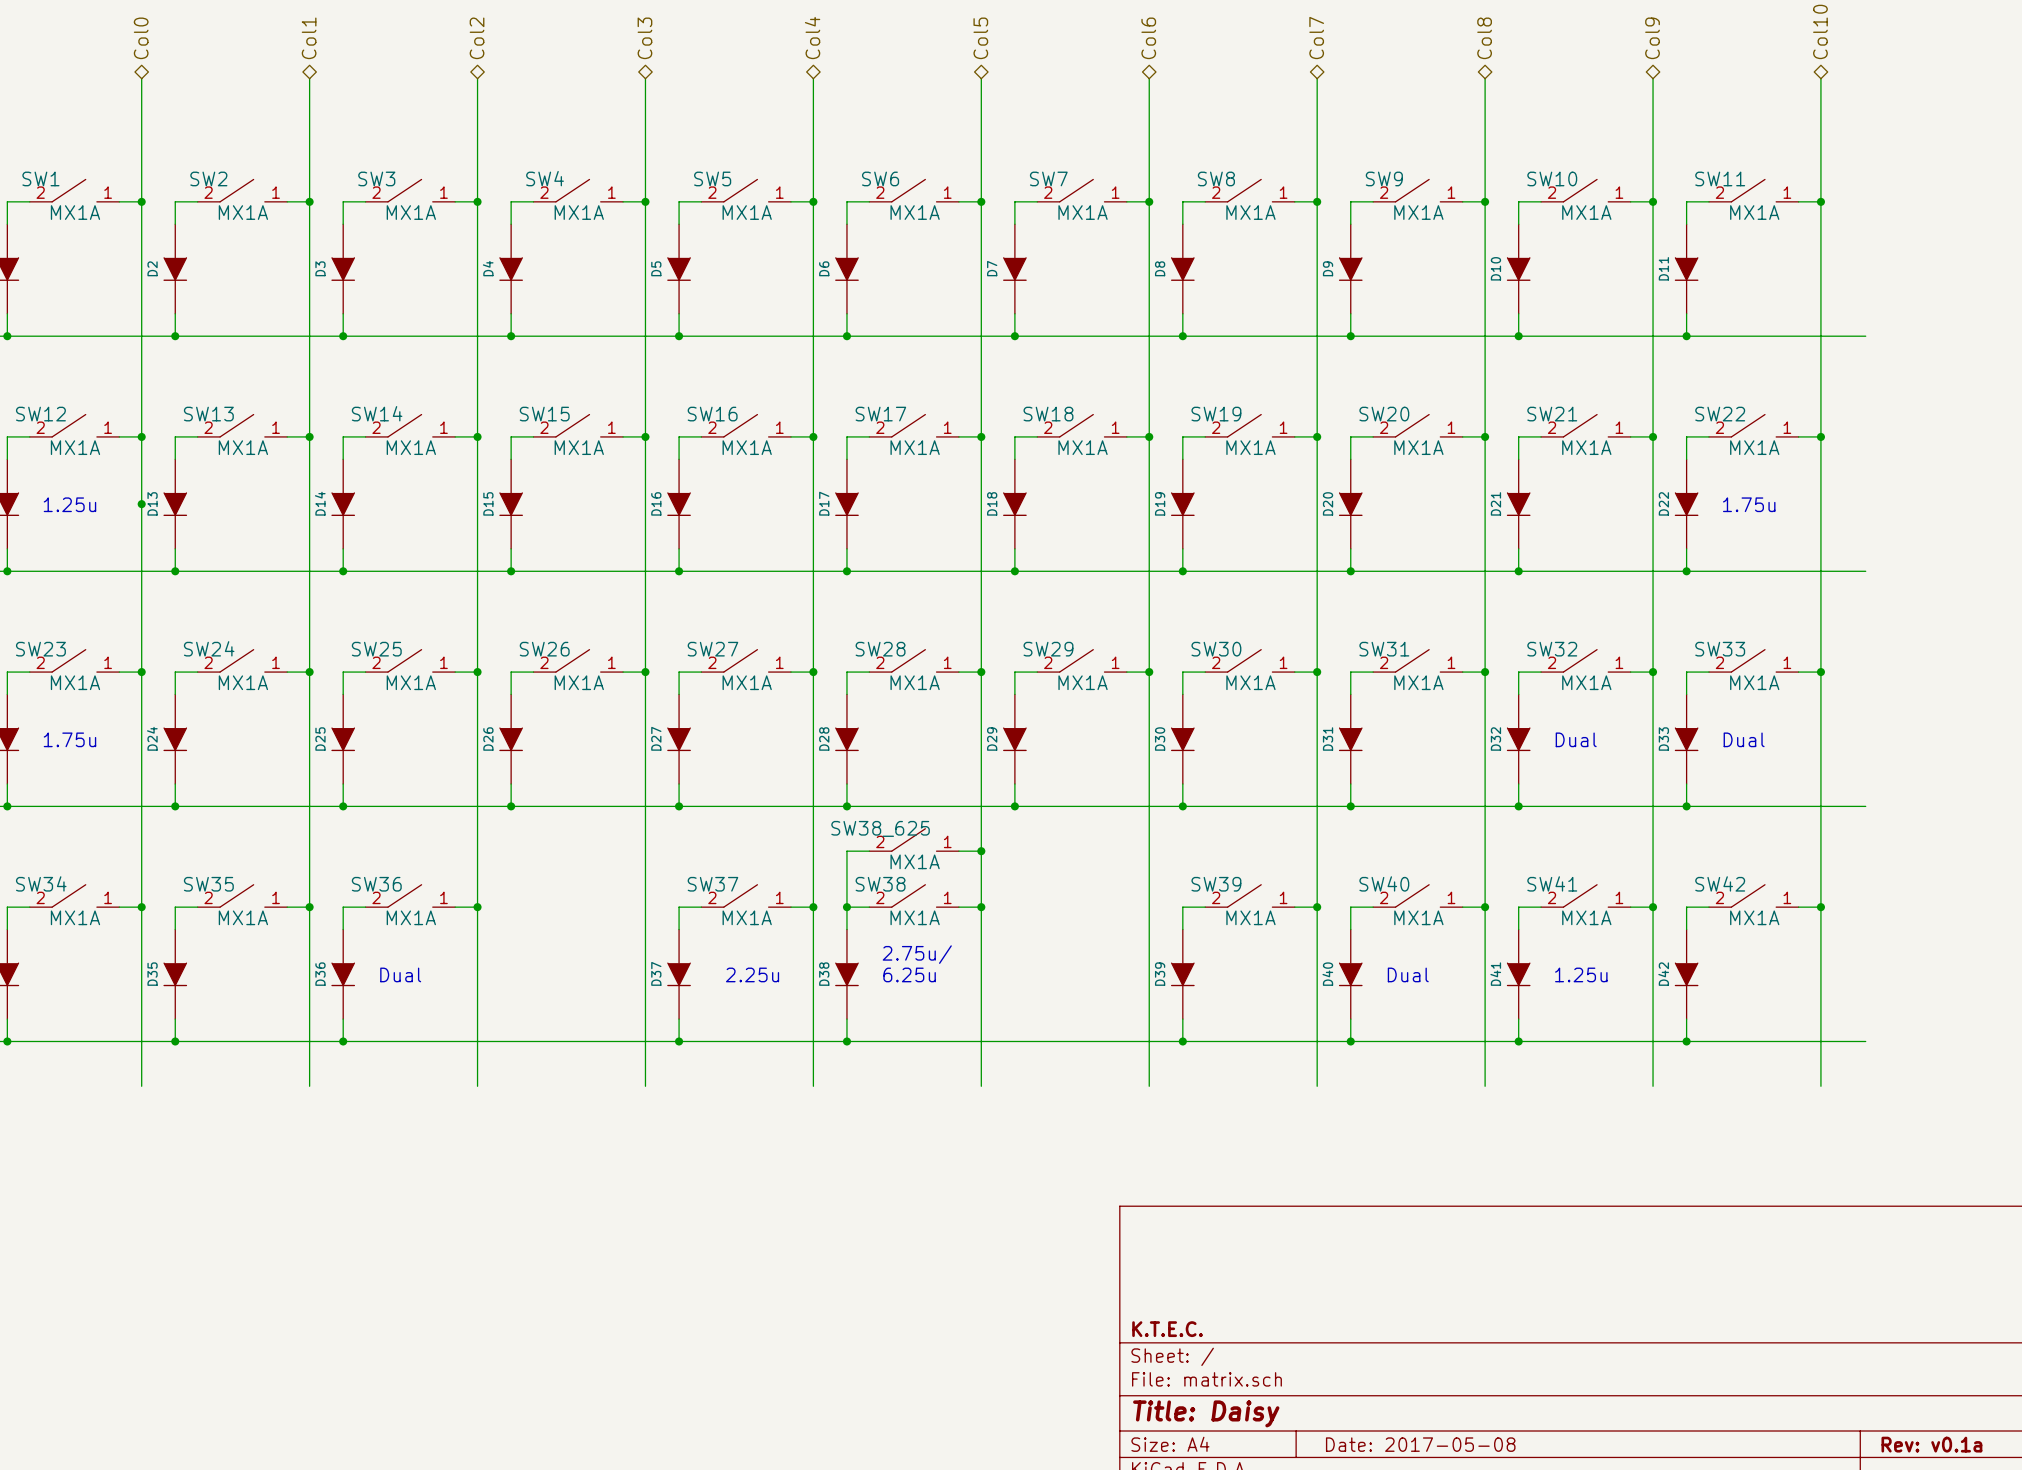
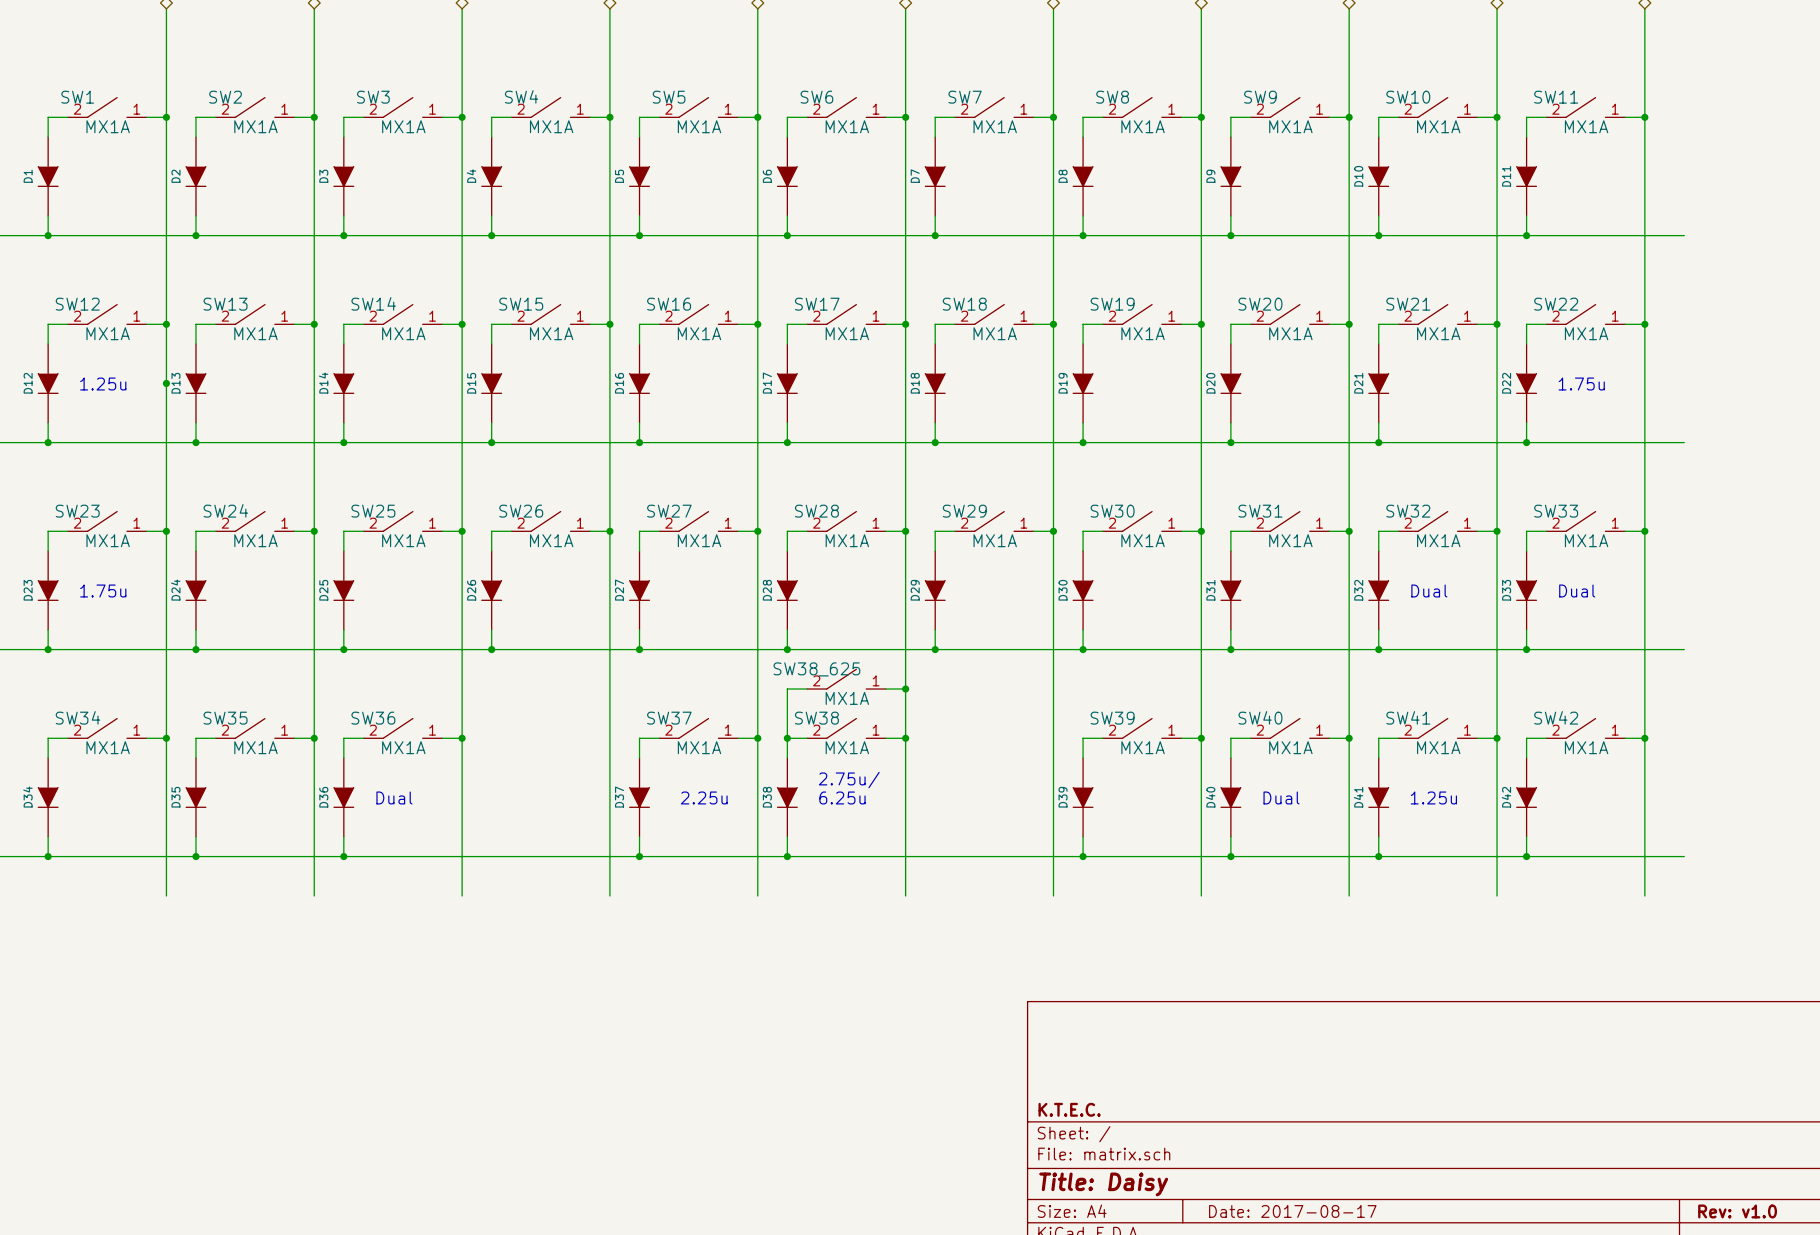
title block: Date: 2017-05-08 (1420, 1444) -> Date: 2017-08-17 (1292, 1211)
title block: Rev: v0.1a (1931, 1444) -> Rev: v1.0 (1737, 1211)

